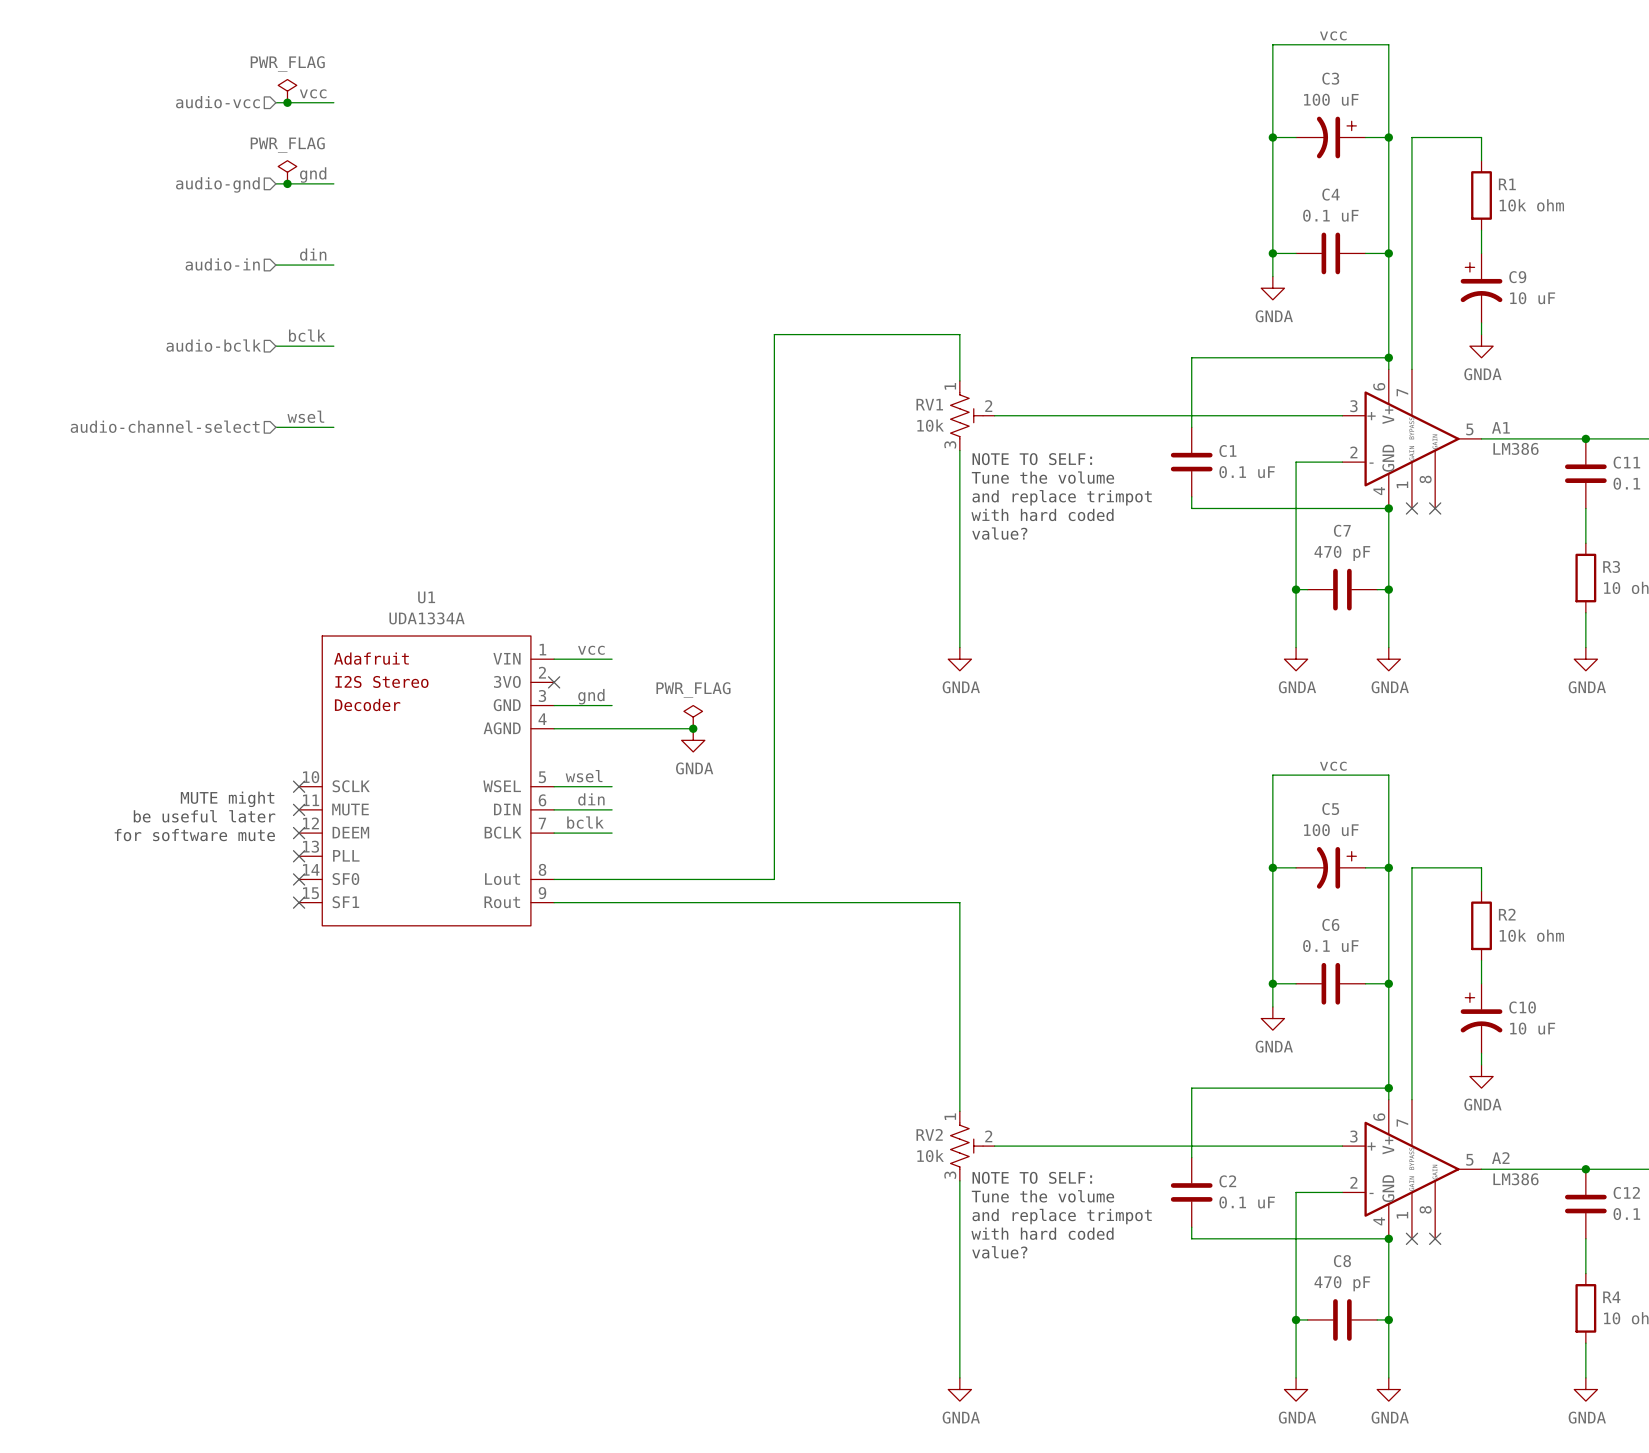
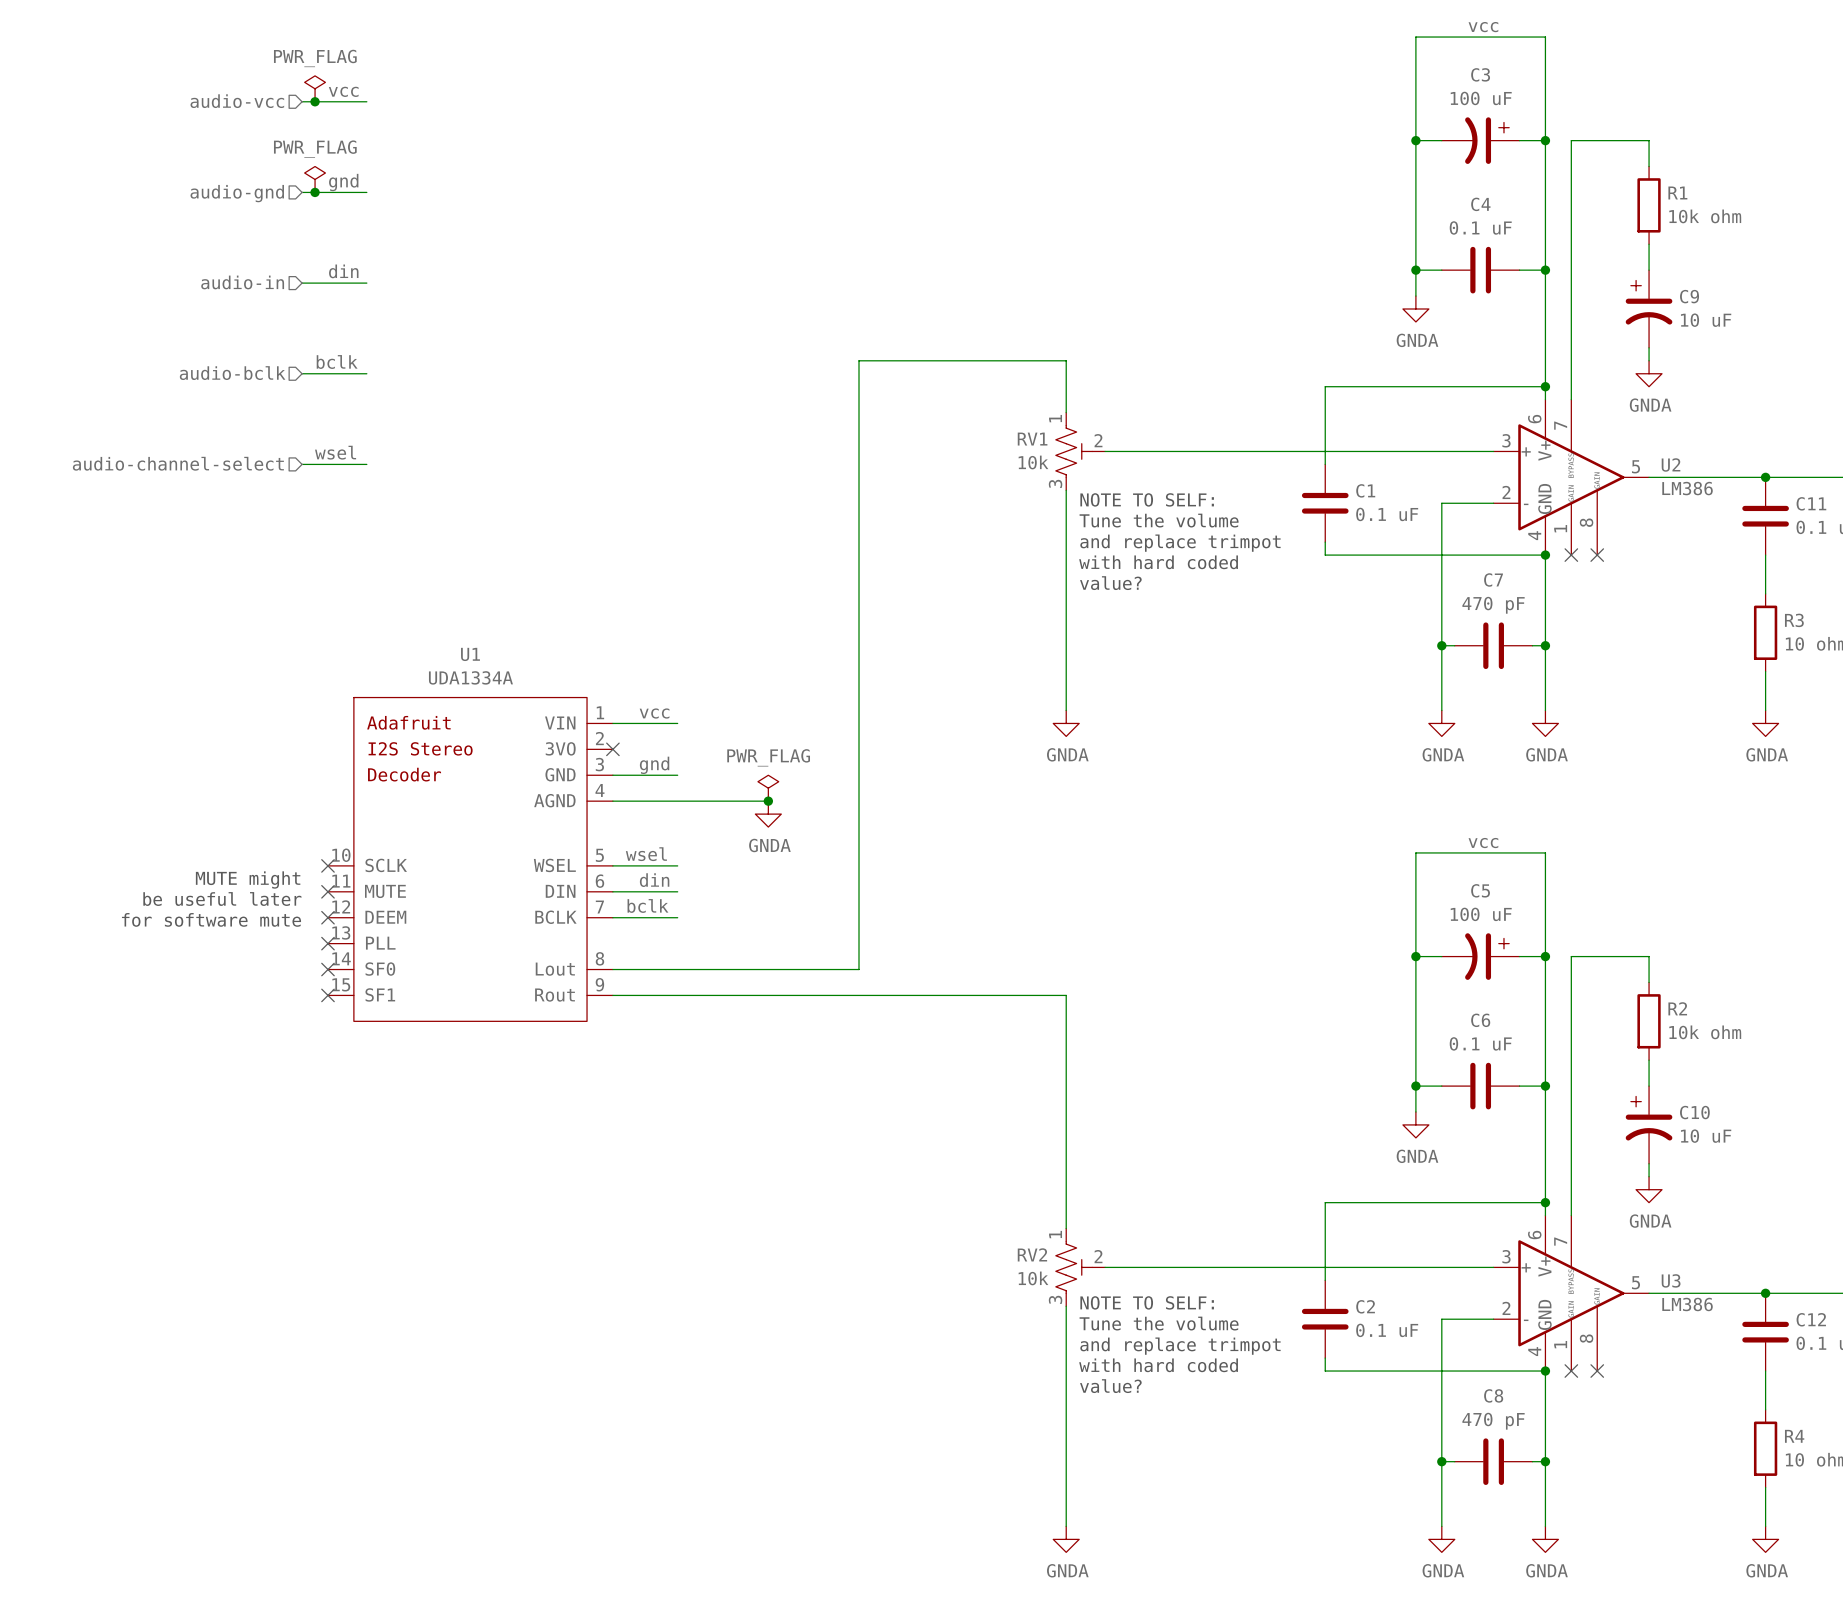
A1 name: A1 (1500, 427) -> U2 (1671, 464)
A2 name: A2 (1500, 1158) -> U3 (1671, 1280)

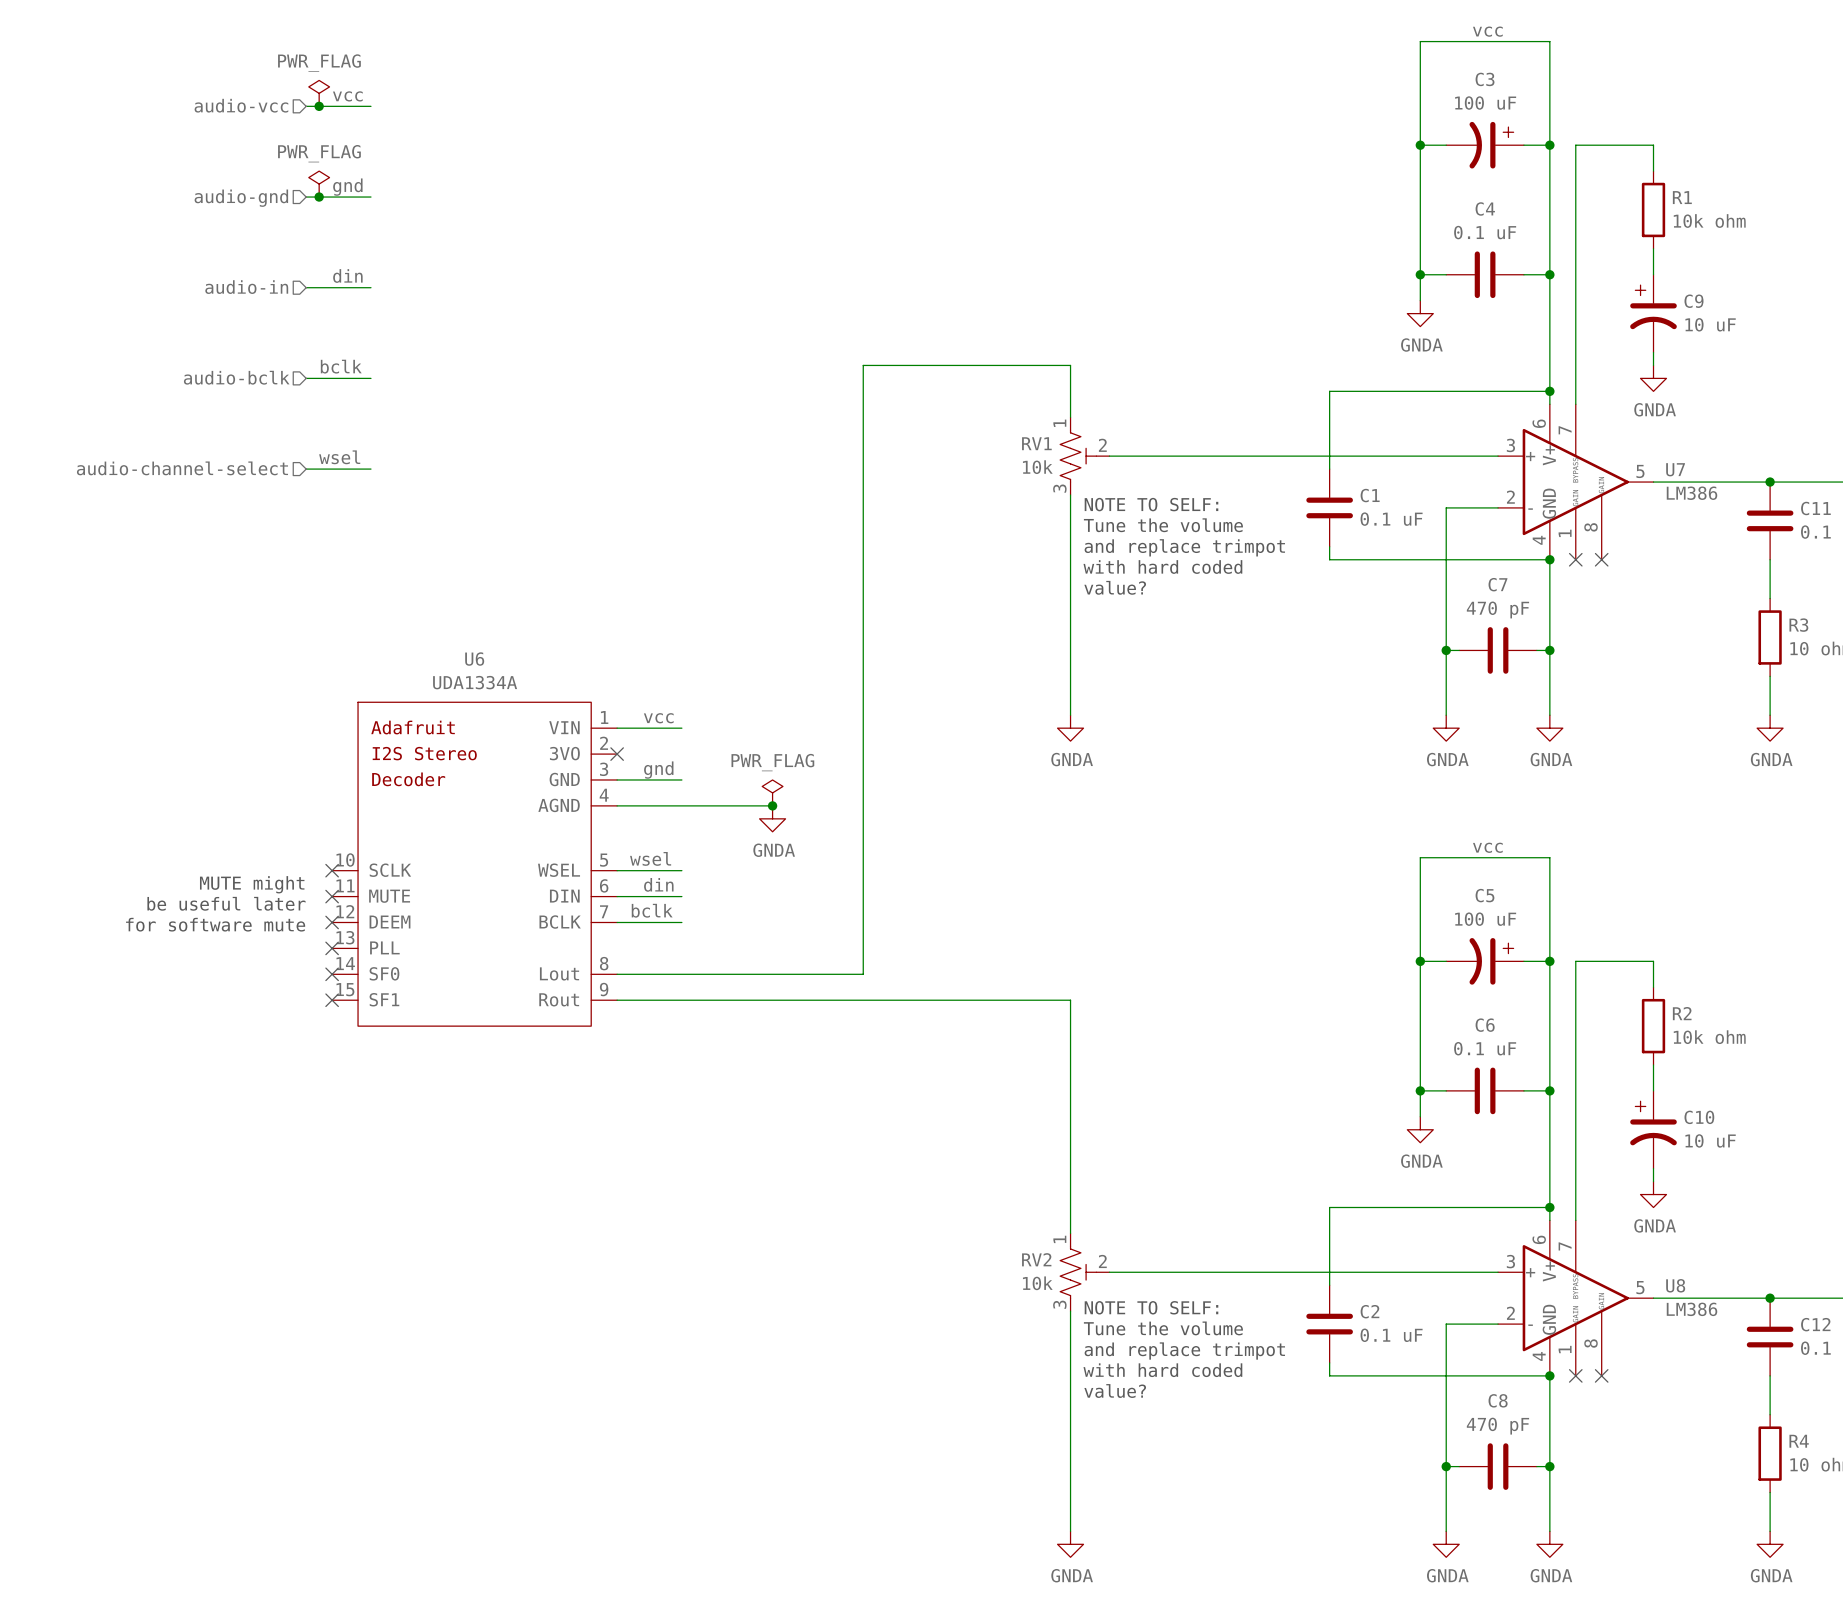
U2 name: U2 (1671, 464) -> U7 (1675, 469)
U1 name: U1 (470, 654) -> U6 (474, 659)
U3 name: U3 (1671, 1280) -> U8 (1675, 1285)

